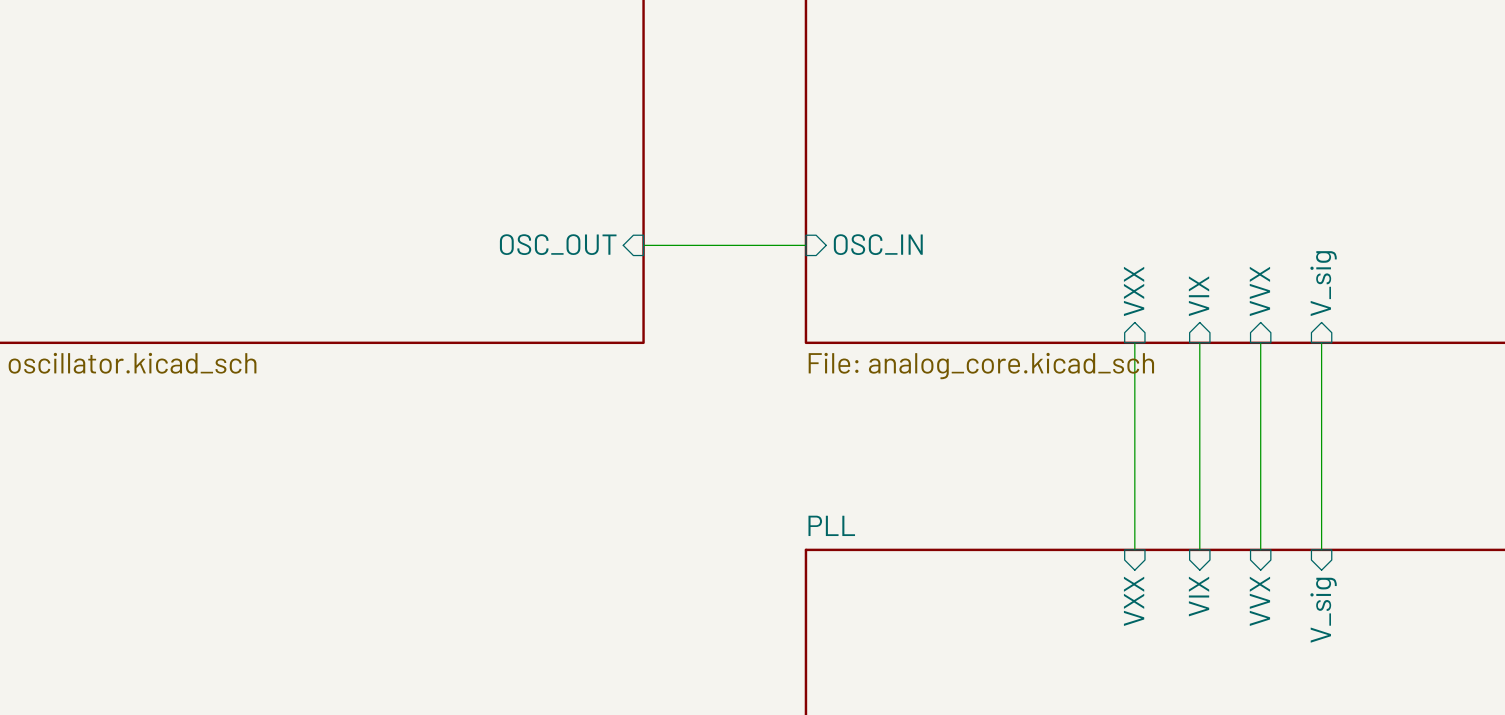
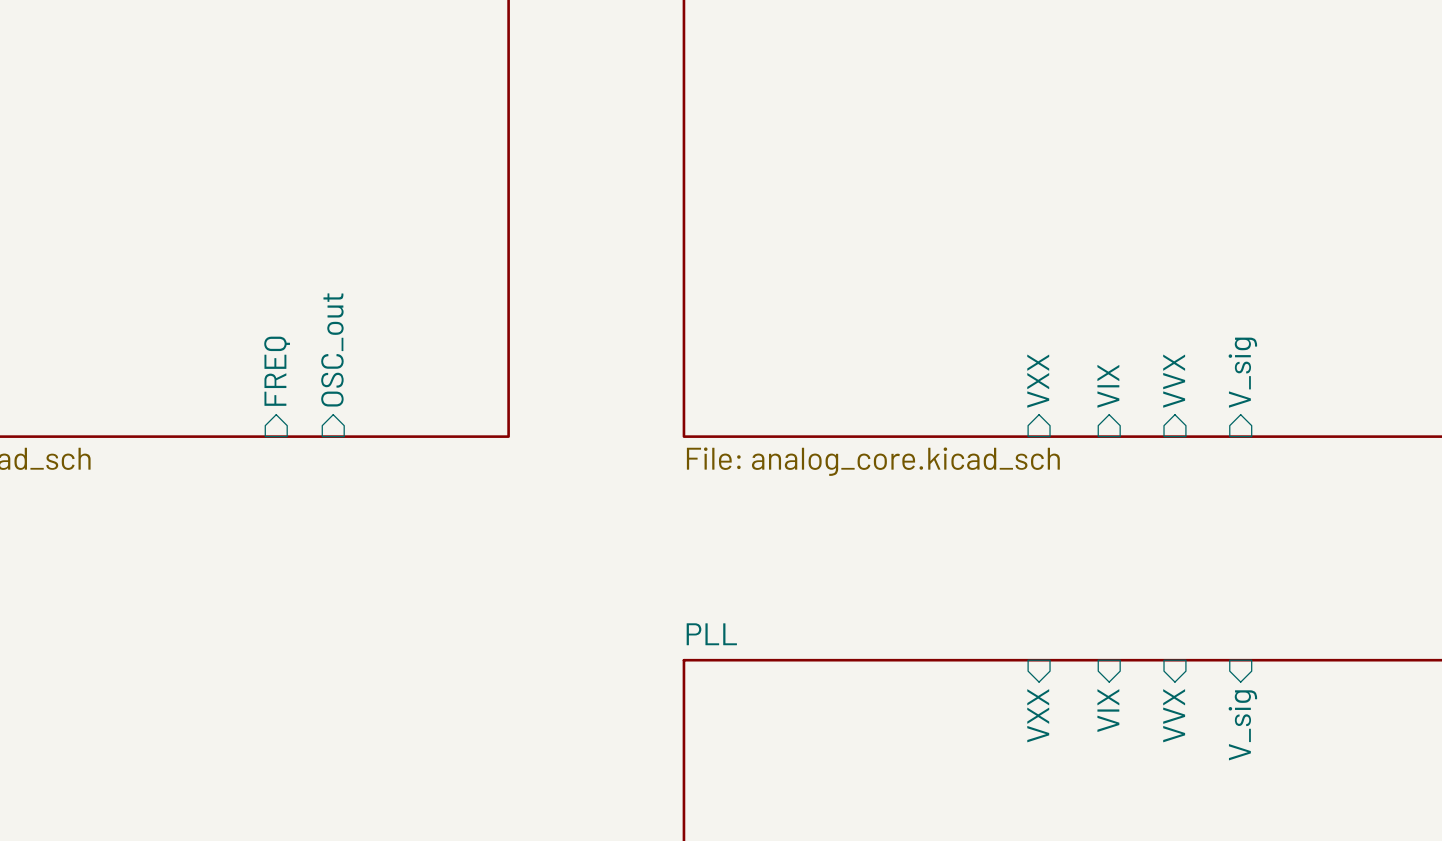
sheet pin: OSC_OUT (558, 244) -> none
sheet pin: OSC_IN (878, 244) -> none
wire: (643, 245) (805, 245) -> none
sheet pin: none -> OSC_out (332, 349)
sheet pin: none -> FREQ (277, 371)
wire: (1134, 342) (1134, 549) -> none
wire: (1199, 342) (1199, 549) -> none
wire: (1260, 342) (1260, 549) -> none
wire: (1321, 342) (1321, 549) -> none

